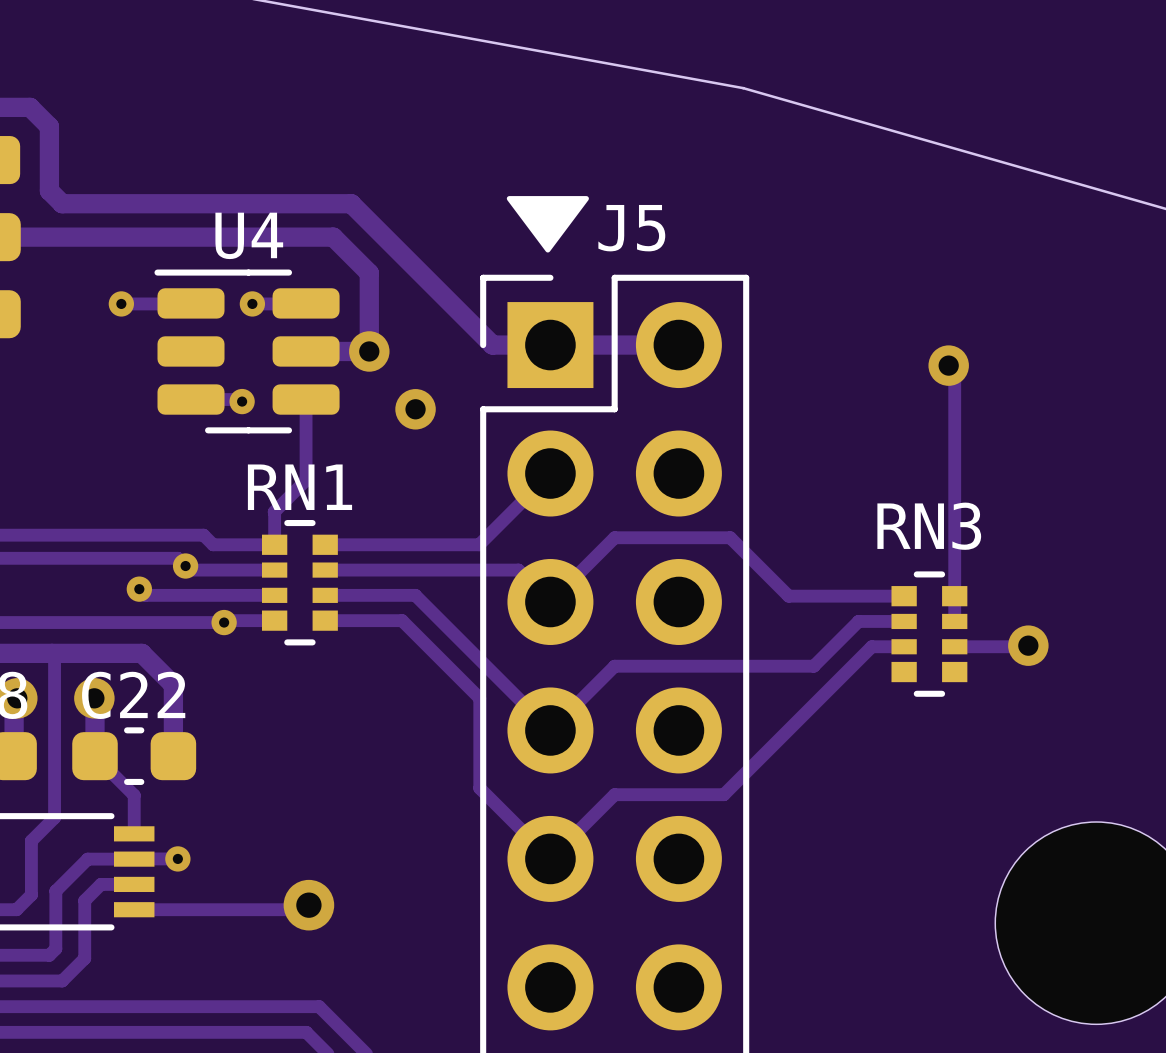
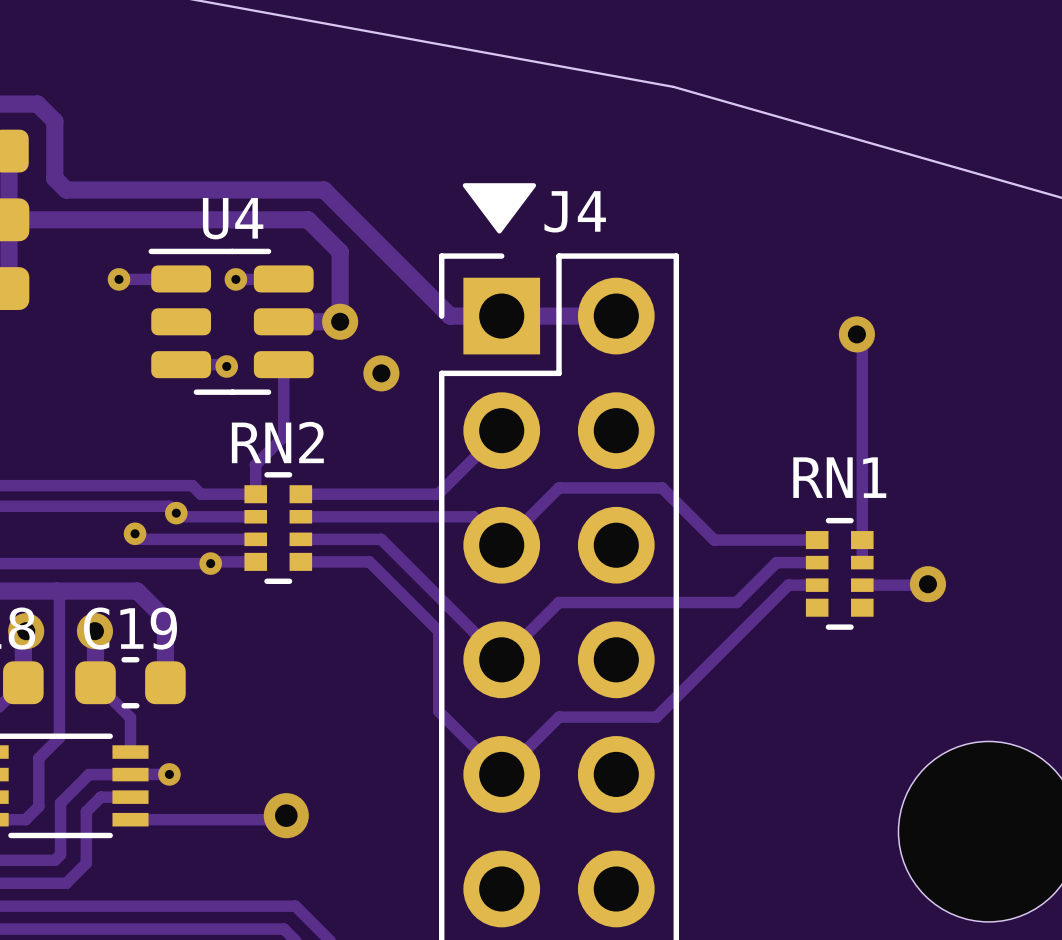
J5 name: J5 (631, 228) -> J4 (575, 211)
RN1 name: RN1 (299, 487) -> RN2 (277, 442)
RN3 name: RN3 (929, 526) -> RN1 (839, 477)
C22 name: C22 (133, 695) -> C19 (130, 628)

